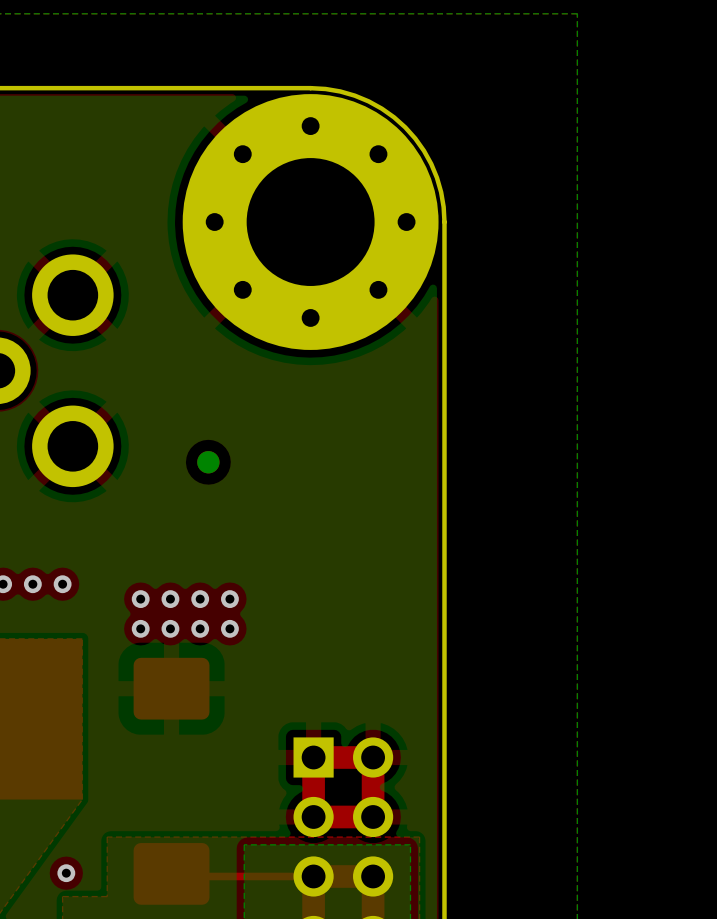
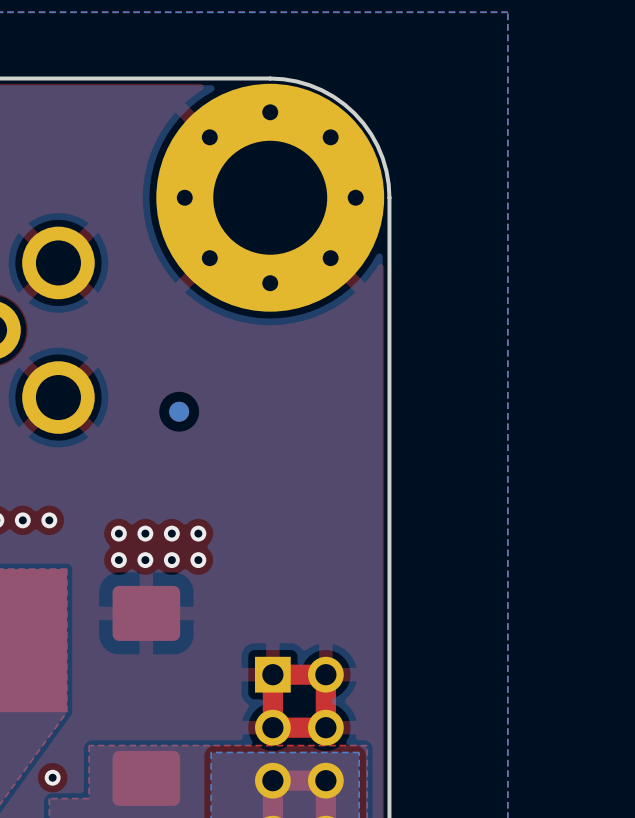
top track: (171, 873) (174, 876) (313, 876) -> none

